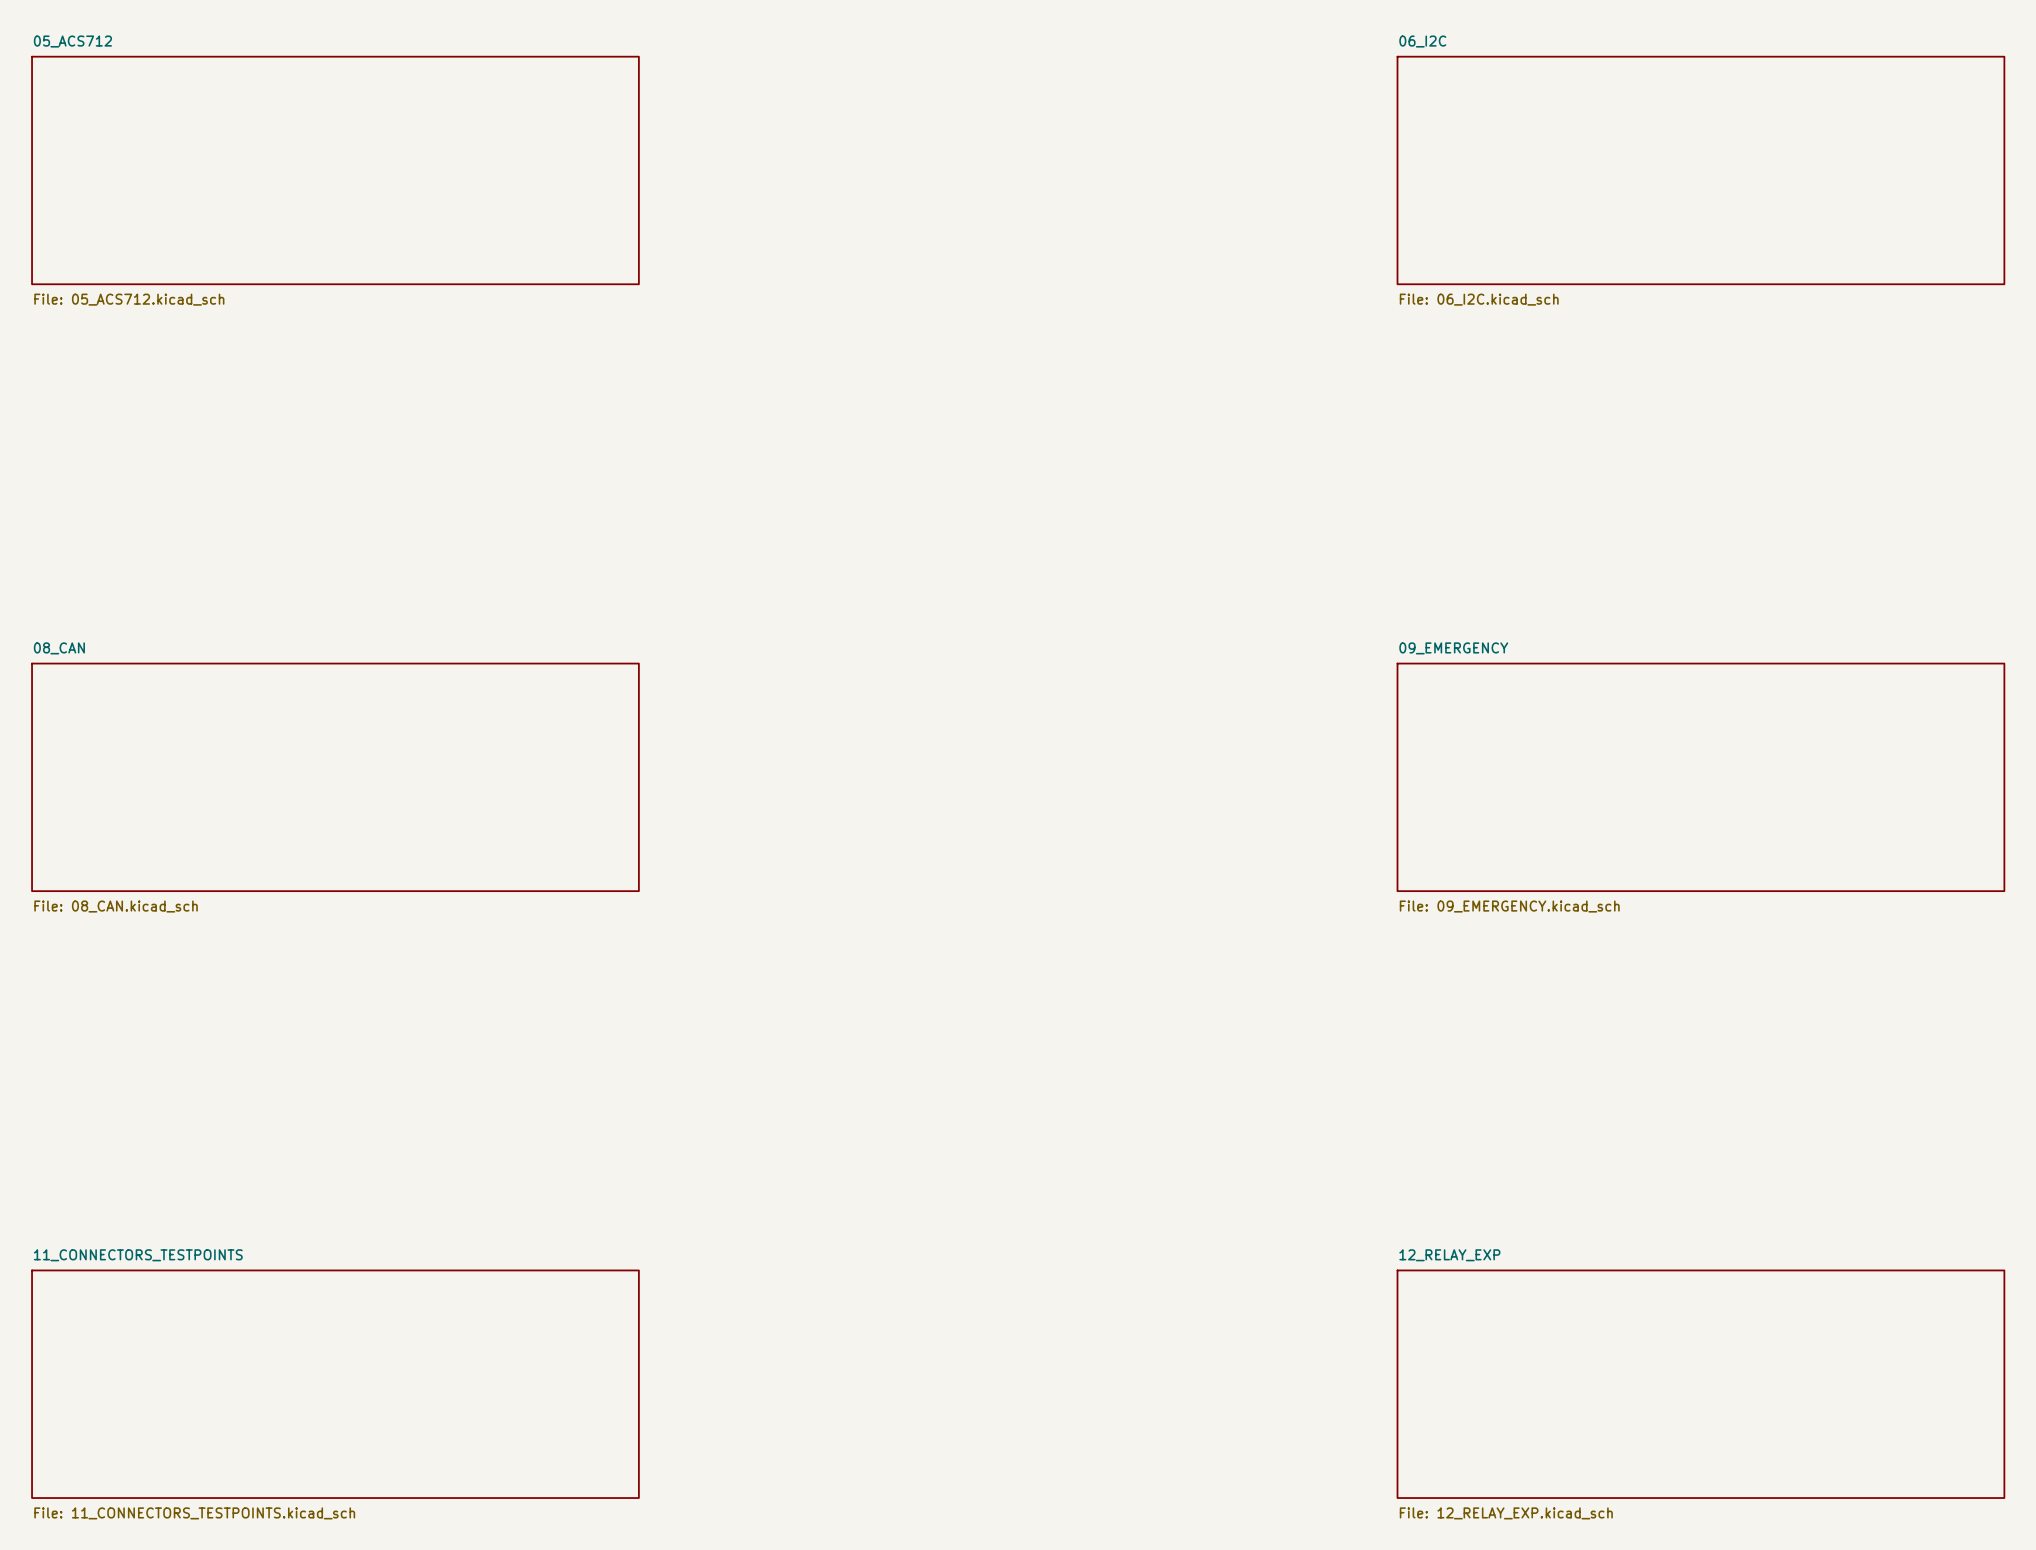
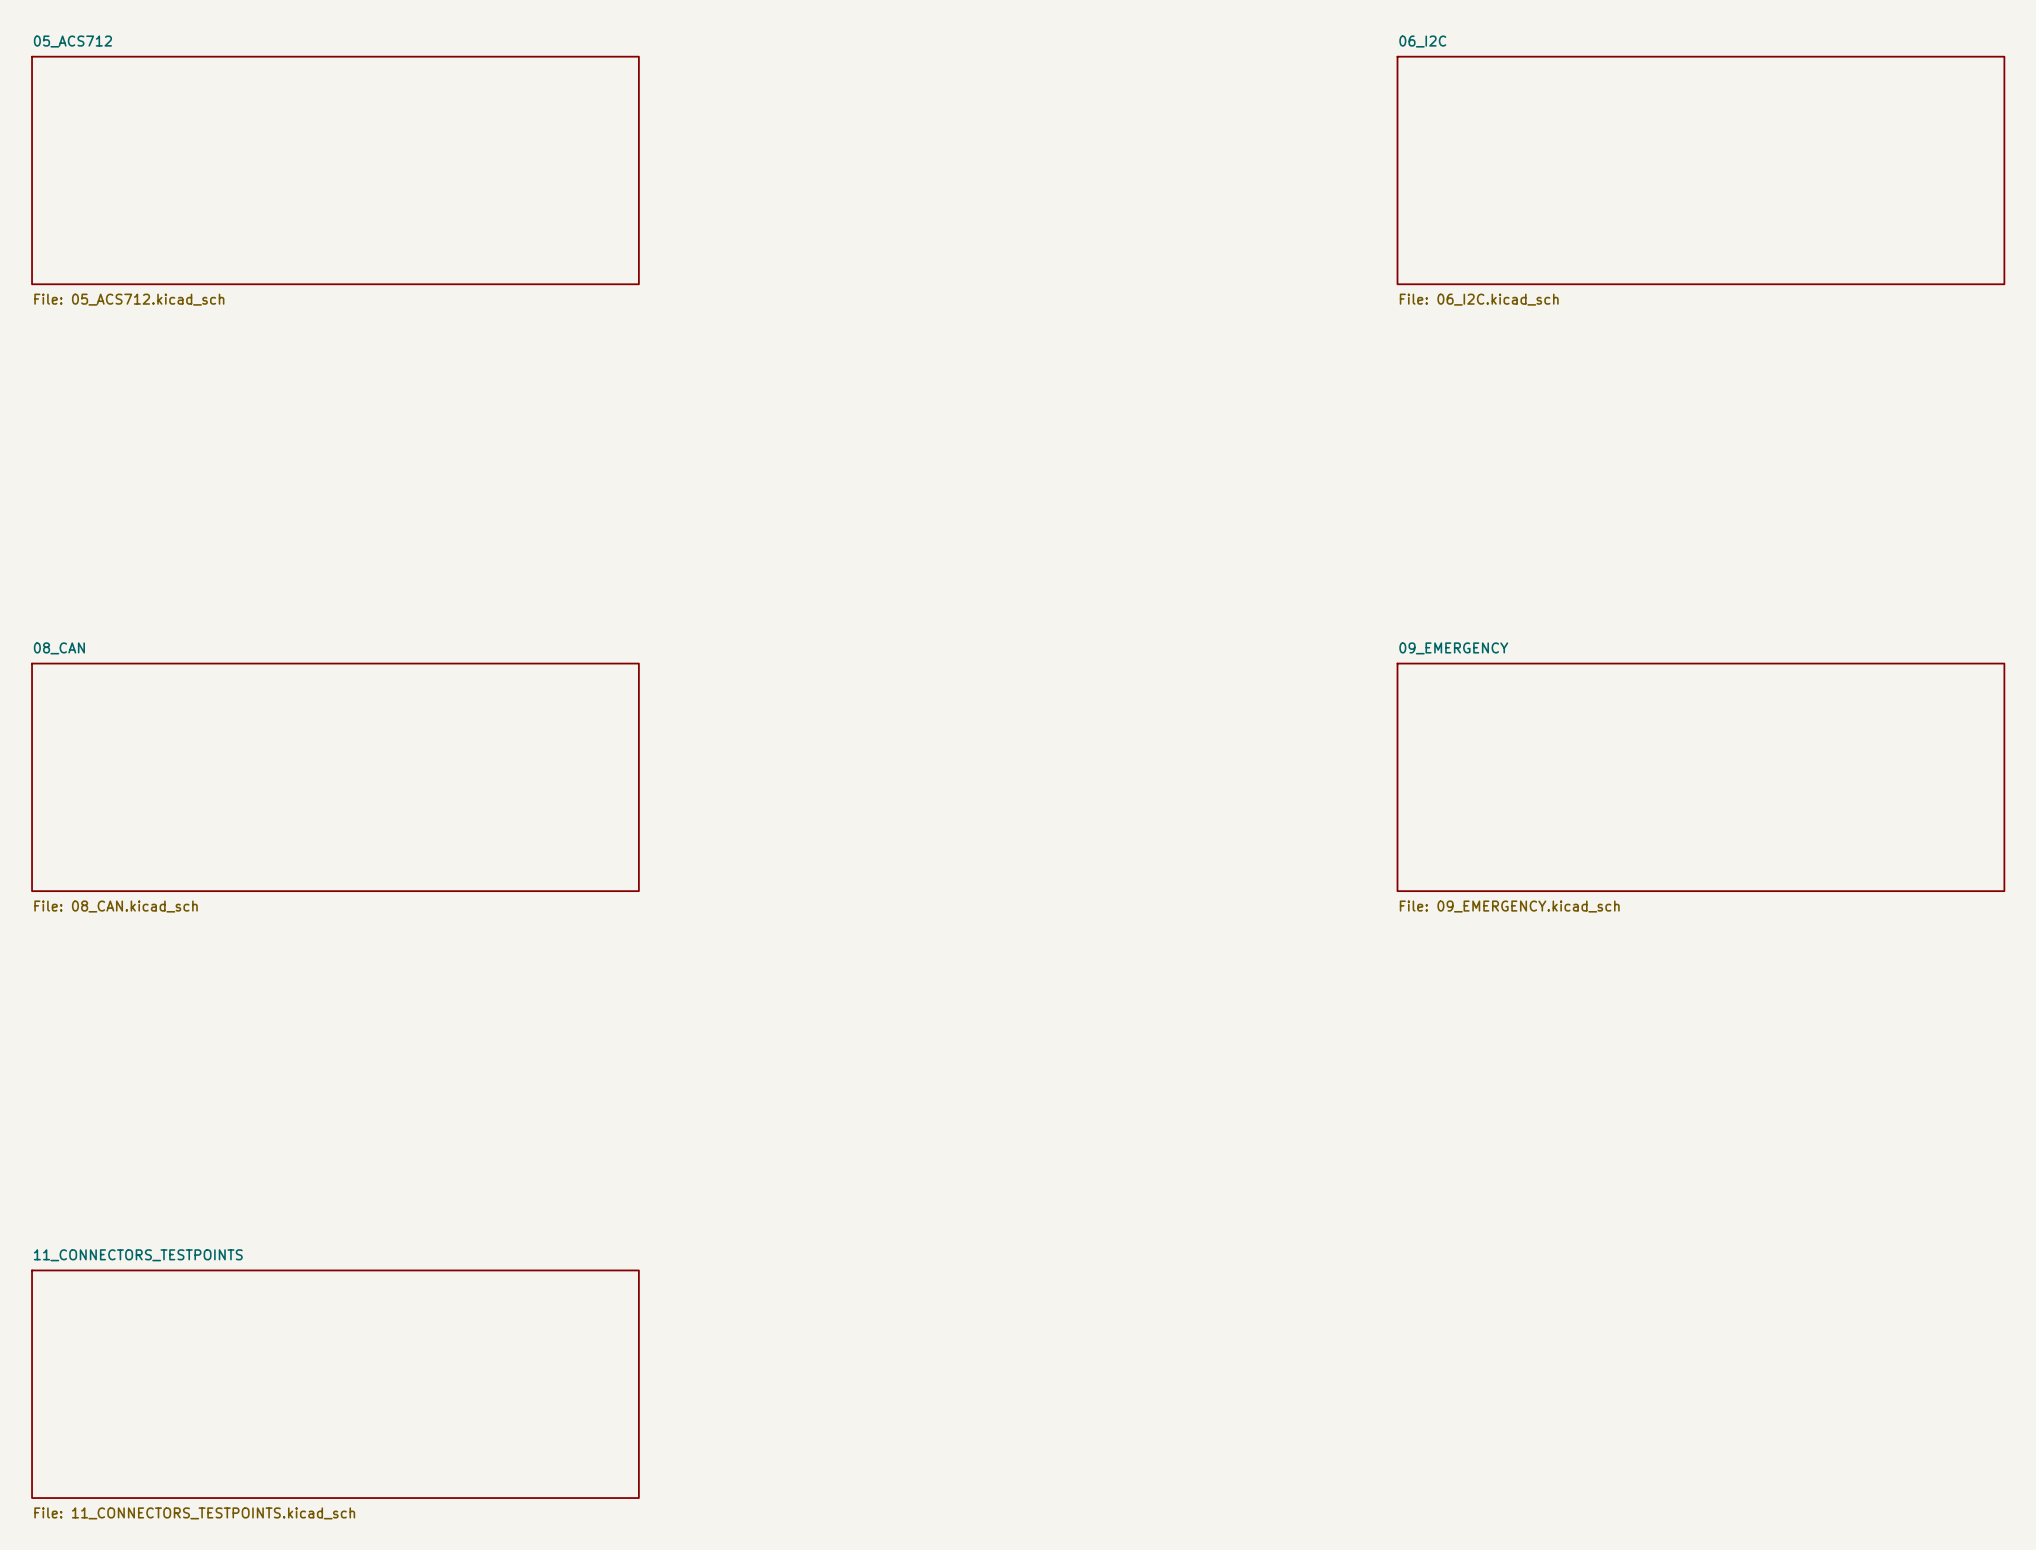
sheet 12_RELAY_EXP: File: 12_RELAY_EXP.kicad_sch (1700, 1384) -> none

